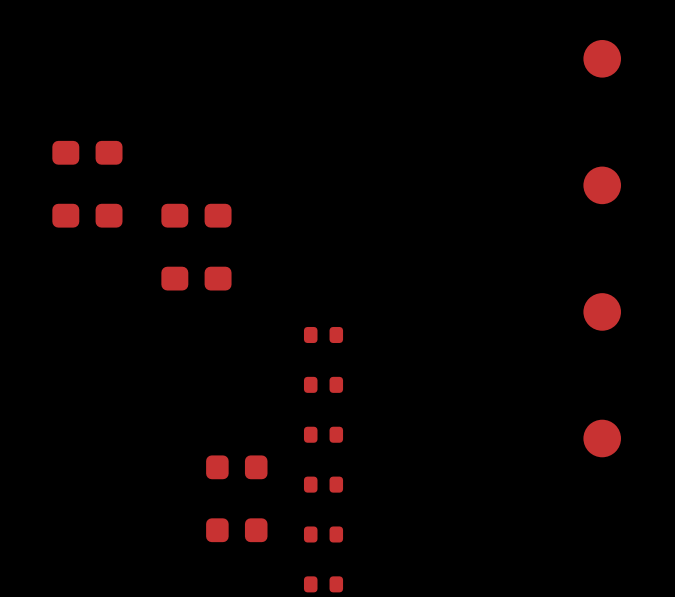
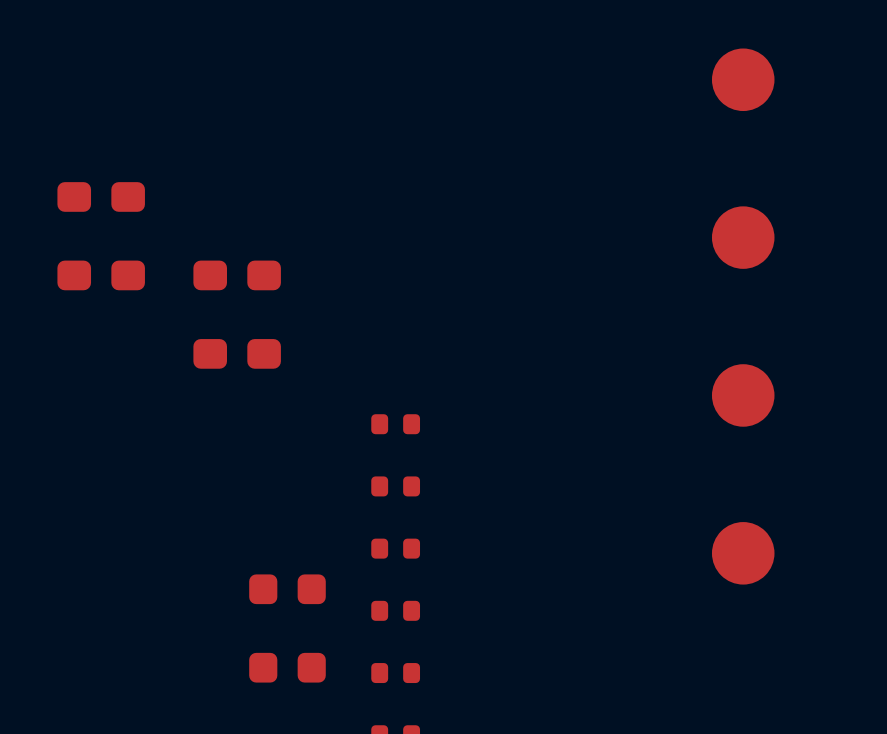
part footprint: [583, 40, 622, 78] -> [711, 48, 775, 112]
part footprint: [583, 166, 622, 205] -> [711, 206, 775, 269]
part footprint: [583, 293, 622, 331] -> [711, 364, 775, 427]
part footprint: [583, 419, 622, 458] -> [711, 522, 775, 585]

